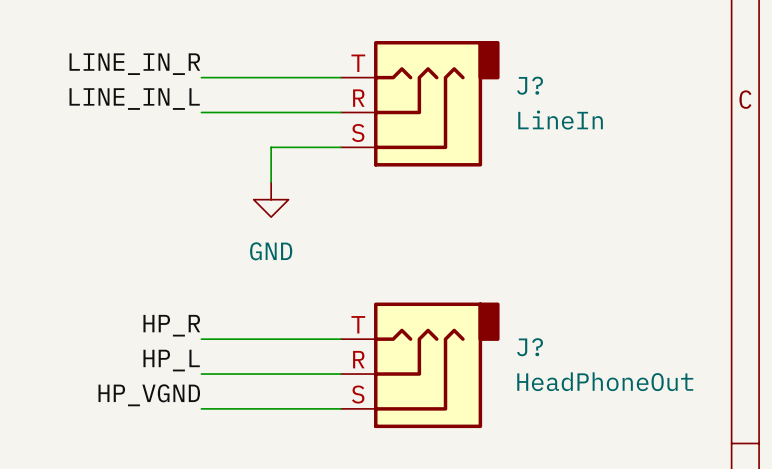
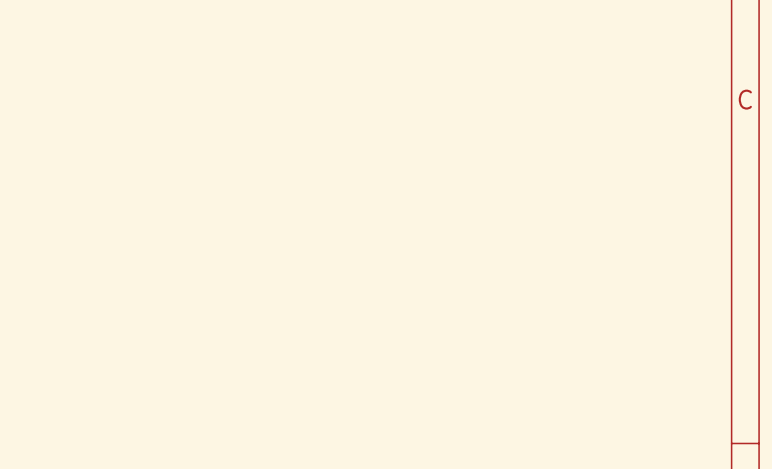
label: LINE_IN_R (134, 64) -> none
wire: (201, 77) (340, 77) -> none
label: LINE_IN_L (134, 99) -> none
J?: LineIn (420, 103) -> none
wire: (201, 112) (340, 112) -> none
wire: (340, 147) (271, 147) (271, 182) -> none
power symbol: GND (271, 199) -> none
label: HP_R (171, 325) -> none
wire: (201, 339) (340, 339) -> none
label: HP_L (171, 360) -> none
J?: HeadPhoneOut (420, 365) -> none
wire: (201, 374) (340, 374) -> none
label: HP_VGND (149, 395) -> none
wire: (201, 408) (340, 408) -> none

